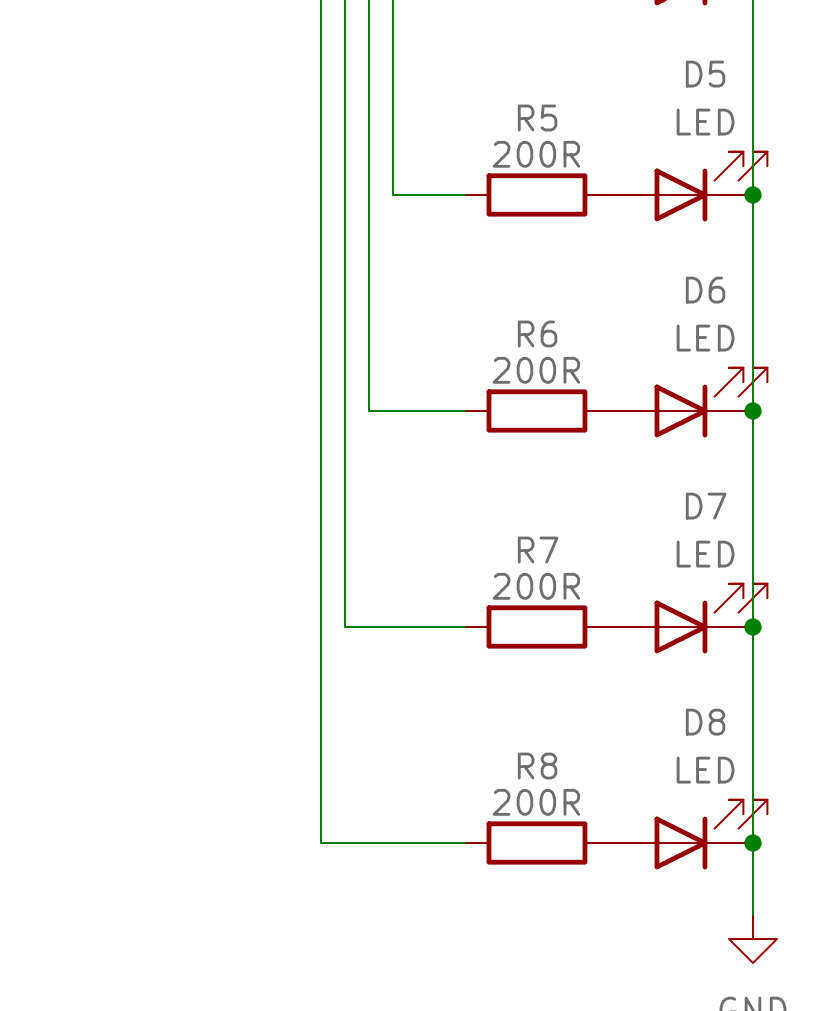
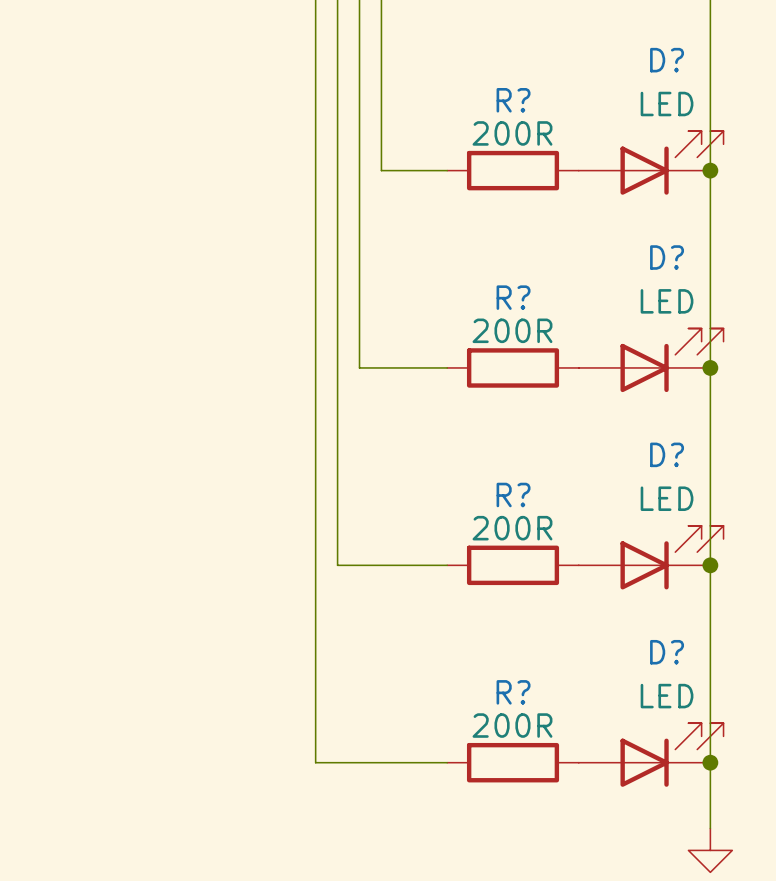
D5 name: D5 (705, 74) -> D? (667, 60)
R5 name: R5 (537, 117) -> R? (513, 100)
D6 name: D6 (705, 290) -> D? (667, 257)
R6 name: R6 (537, 334) -> R? (513, 297)
D7 name: D7 (706, 506) -> D? (667, 454)
R7 name: R7 (538, 550) -> R? (513, 495)
D8 name: D8 (705, 722) -> D? (667, 652)
R8 name: R8 (537, 766) -> R? (513, 692)

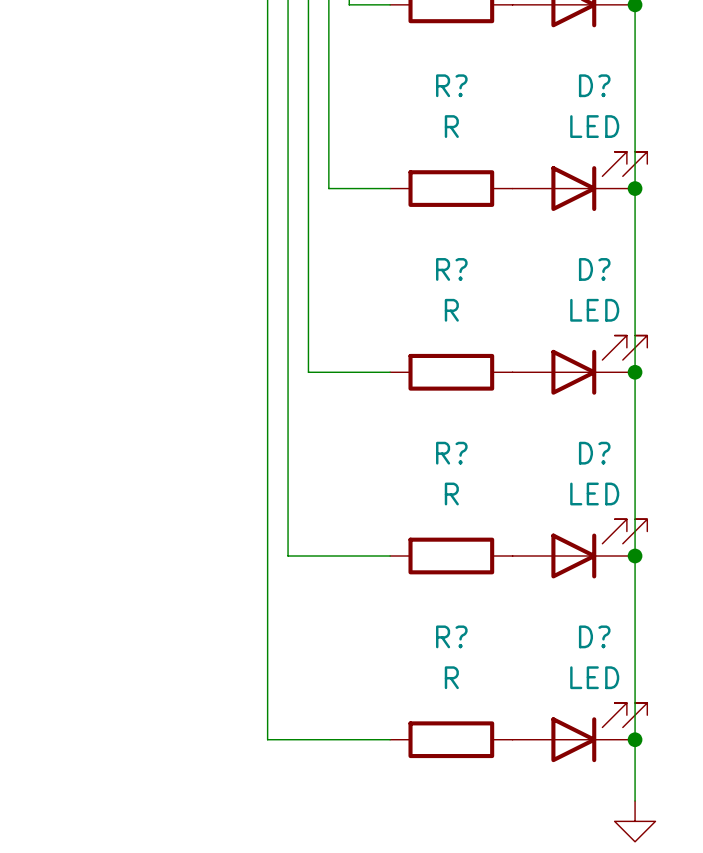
R? name position: R? (513, 100) -> R? (451, 85)
R? value: 200R (512, 133) -> R (451, 126)
R? name position: R? (513, 297) -> R? (451, 269)
R? value: 200R (512, 330) -> R (451, 310)
R? name position: R? (513, 495) -> R? (451, 453)
R? value: 200R (512, 528) -> R (451, 494)
R? name position: R? (513, 692) -> R? (451, 636)
R? value: 200R (512, 725) -> R (451, 677)

